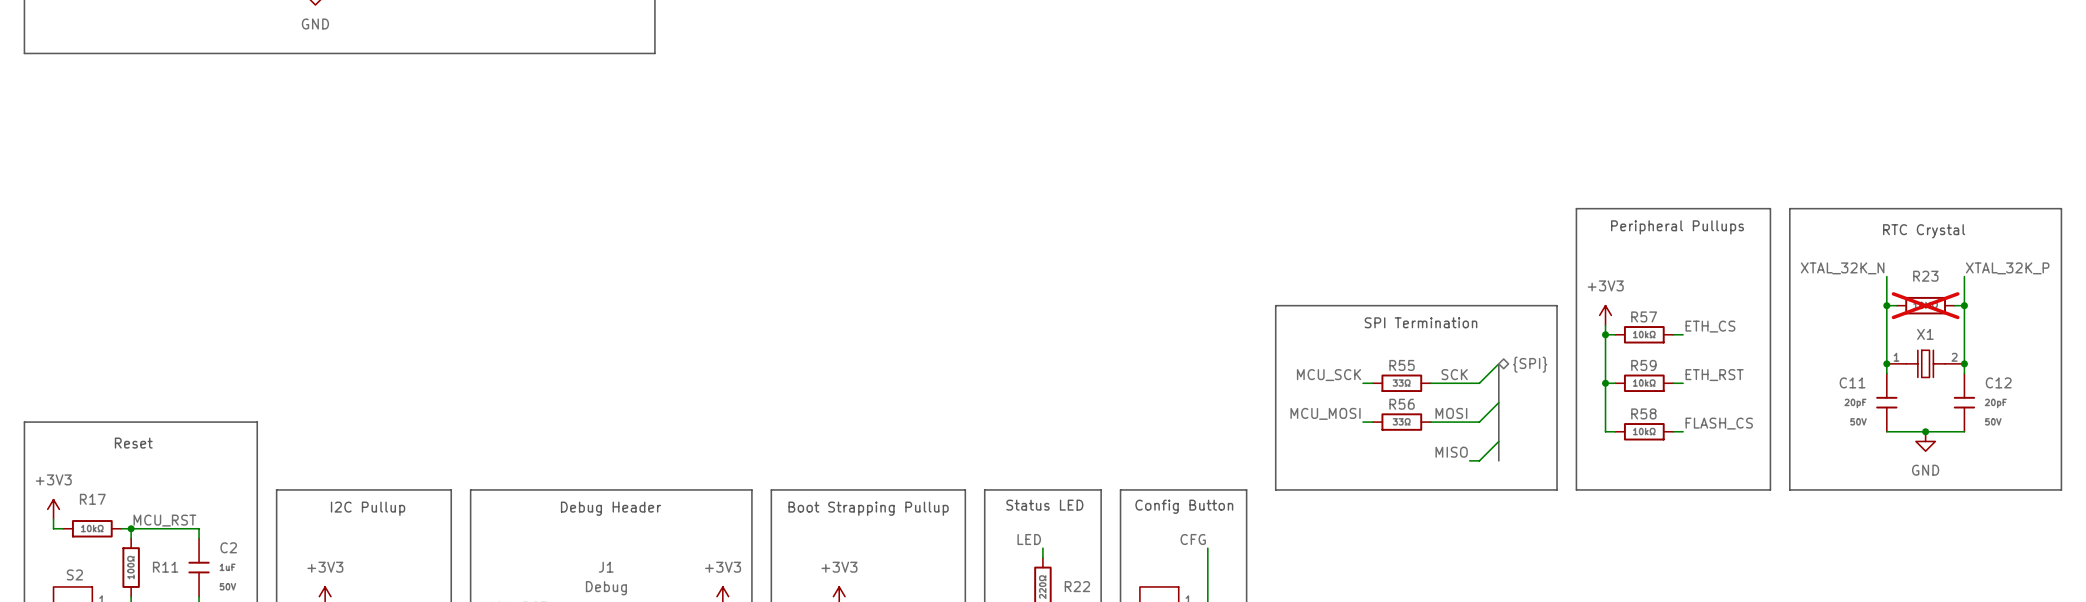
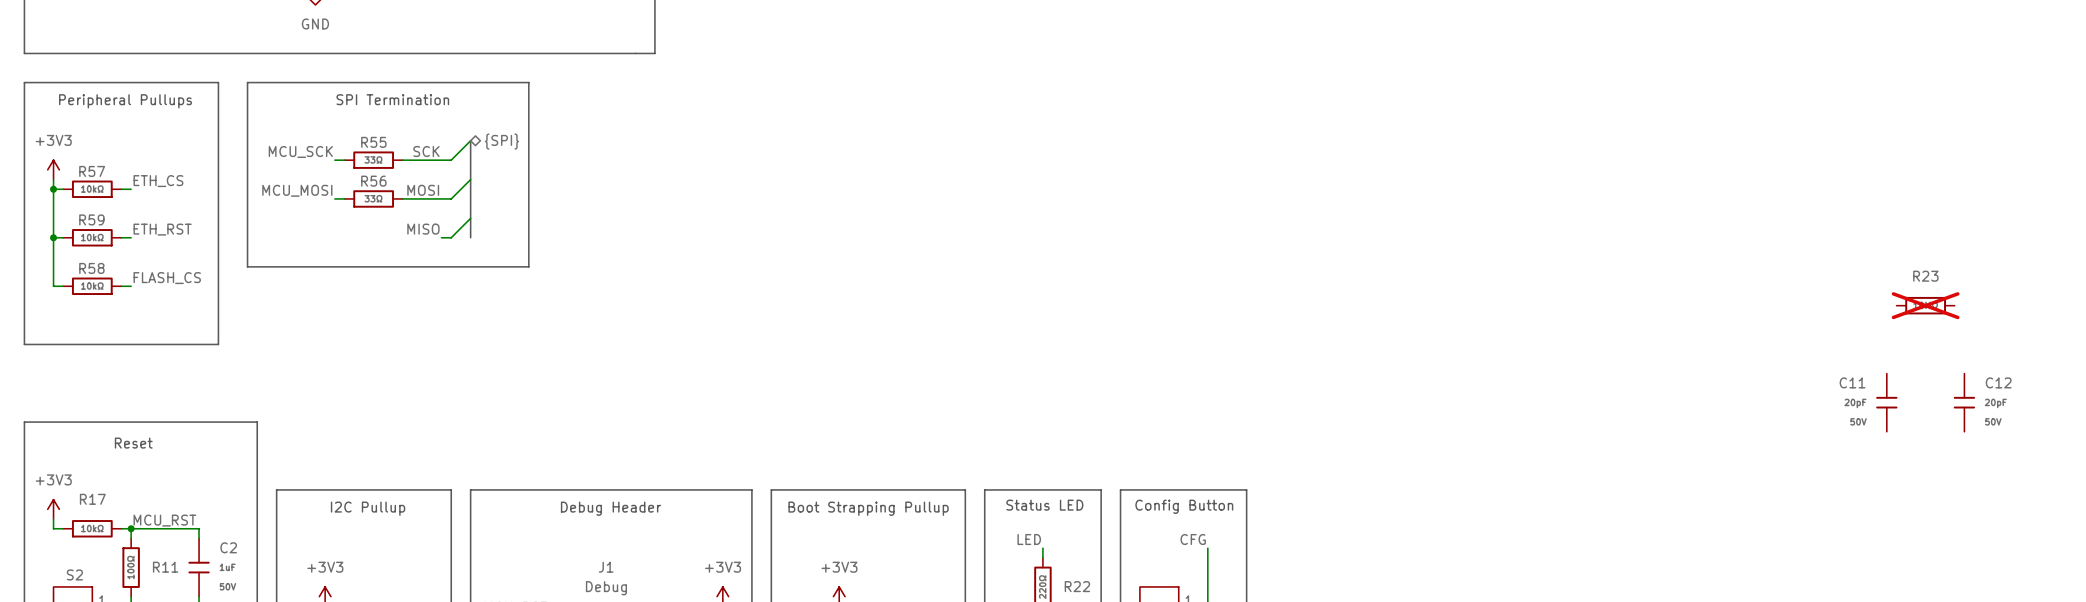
line: none -> (24, 82) (24, 344) (218, 344) (218, 82) (24, 82)
line: none -> (247, 82) (528, 82) (528, 266) (247, 266) (247, 82)
text: none -> SPI Termination (392, 99)
text: none -> Peripheral Pullups (125, 101)
wire: none -> (470, 140) (451, 160) (402, 160)
bus: none -> (470, 140) (470, 237)
hierarchical label: none -> {SPI} (501, 141)
label: none -> MCU_SCK (300, 151)
label: none -> SCK (426, 151)
wire: none -> (334, 160) (344, 160)
power symbol: none -> +3V3 (53, 169)
wire: none -> (53, 179) (53, 286) (63, 286)
wire: none -> (470, 179) (451, 198) (402, 198)
label: none -> ETH_CS (158, 181)
wire: none -> (53, 189) (63, 189)
junction: none -> (53, 189)
wire: none -> (121, 189) (131, 189)
label: none -> MCU_MOSI (297, 190)
label: none -> MOSI (423, 190)
wire: none -> (334, 198) (344, 198)
line: (1576, 208) (1770, 208) (1770, 489) (1576, 489) (1576, 208) -> none
line: (1789, 208) (2061, 208) (2061, 489) (1789, 489) (1789, 208) -> none
wire: none -> (470, 218) (451, 237) (441, 237)
text: Peripheral Pullups (1677, 227) -> none
label: none -> ETH_RST (162, 229)
label: none -> MISO (423, 229)
text: RTC Crystal (1924, 231) -> none
wire: none -> (53, 237) (63, 237)
junction: none -> (53, 237)
wire: none -> (121, 237) (131, 237)
label: XTAL_32K_N (1842, 268) -> none
label: XTAL_32K_P (2007, 268) -> none
wire: (1886, 276) (1886, 373) -> none
wire: (1964, 276) (1964, 373) -> none
label: none -> FLASH_CS (167, 278)
wire: none -> (121, 286) (131, 286)
line: (1275, 305) (1557, 305) (1557, 489) (1275, 489) (1275, 305) -> none
wire: (1886, 305) (1896, 305) -> none
junction: (1886, 305) -> none
wire: (1954, 305) (1964, 305) -> none
junction: (1964, 305) -> none
power symbol: +3V3 (1605, 315) -> none
text: SPI Termination (1420, 322) -> none
wire: (1605, 325) (1605, 431) (1615, 431) -> none
label: ETH_CS (1710, 326) -> none
wire: (1605, 334) (1615, 334) -> none
junction: (1605, 334) -> none
R57 position: (1644, 334) -> (92, 189)
wire: (1673, 334) (1683, 334) -> none
wire: (1498, 363) (1479, 383) (1430, 383) -> none
bus: (1498, 363) (1498, 460) -> none
junction: (1886, 363) -> none
X1: (1925, 363) -> none
junction: (1964, 363) -> none
hierarchical label: {SPI} (1530, 364) -> none
label: SCK (1454, 374) -> none
label: MCU_SCK (1329, 375) -> none
label: ETH_RST (1714, 375) -> none
wire: (1363, 383) (1372, 383) -> none
R55 position: (1401, 383) -> (373, 160)
wire: (1605, 383) (1615, 383) -> none
junction: (1605, 383) -> none
R59 position: (1644, 383) -> (92, 237)
wire: (1673, 383) (1683, 383) -> none
wire: (1498, 402) (1479, 422) (1430, 422) -> none
label: MCU_MOSI (1325, 413) -> none
label: MOSI (1451, 413) -> none
wire: (1363, 422) (1372, 422) -> none
R56 position: (1401, 422) -> (373, 198)
label: FLASH_CS (1719, 423) -> none
R58 position: (1644, 431) -> (92, 286)
wire: (1673, 431) (1683, 431) -> none
wire: (1886, 431) (1964, 431) -> none
junction: (1925, 431) -> none
wire: (1498, 441) (1479, 460) (1469, 460) -> none
power symbol: GND (1925, 441) -> none
label: MISO (1451, 452) -> none

